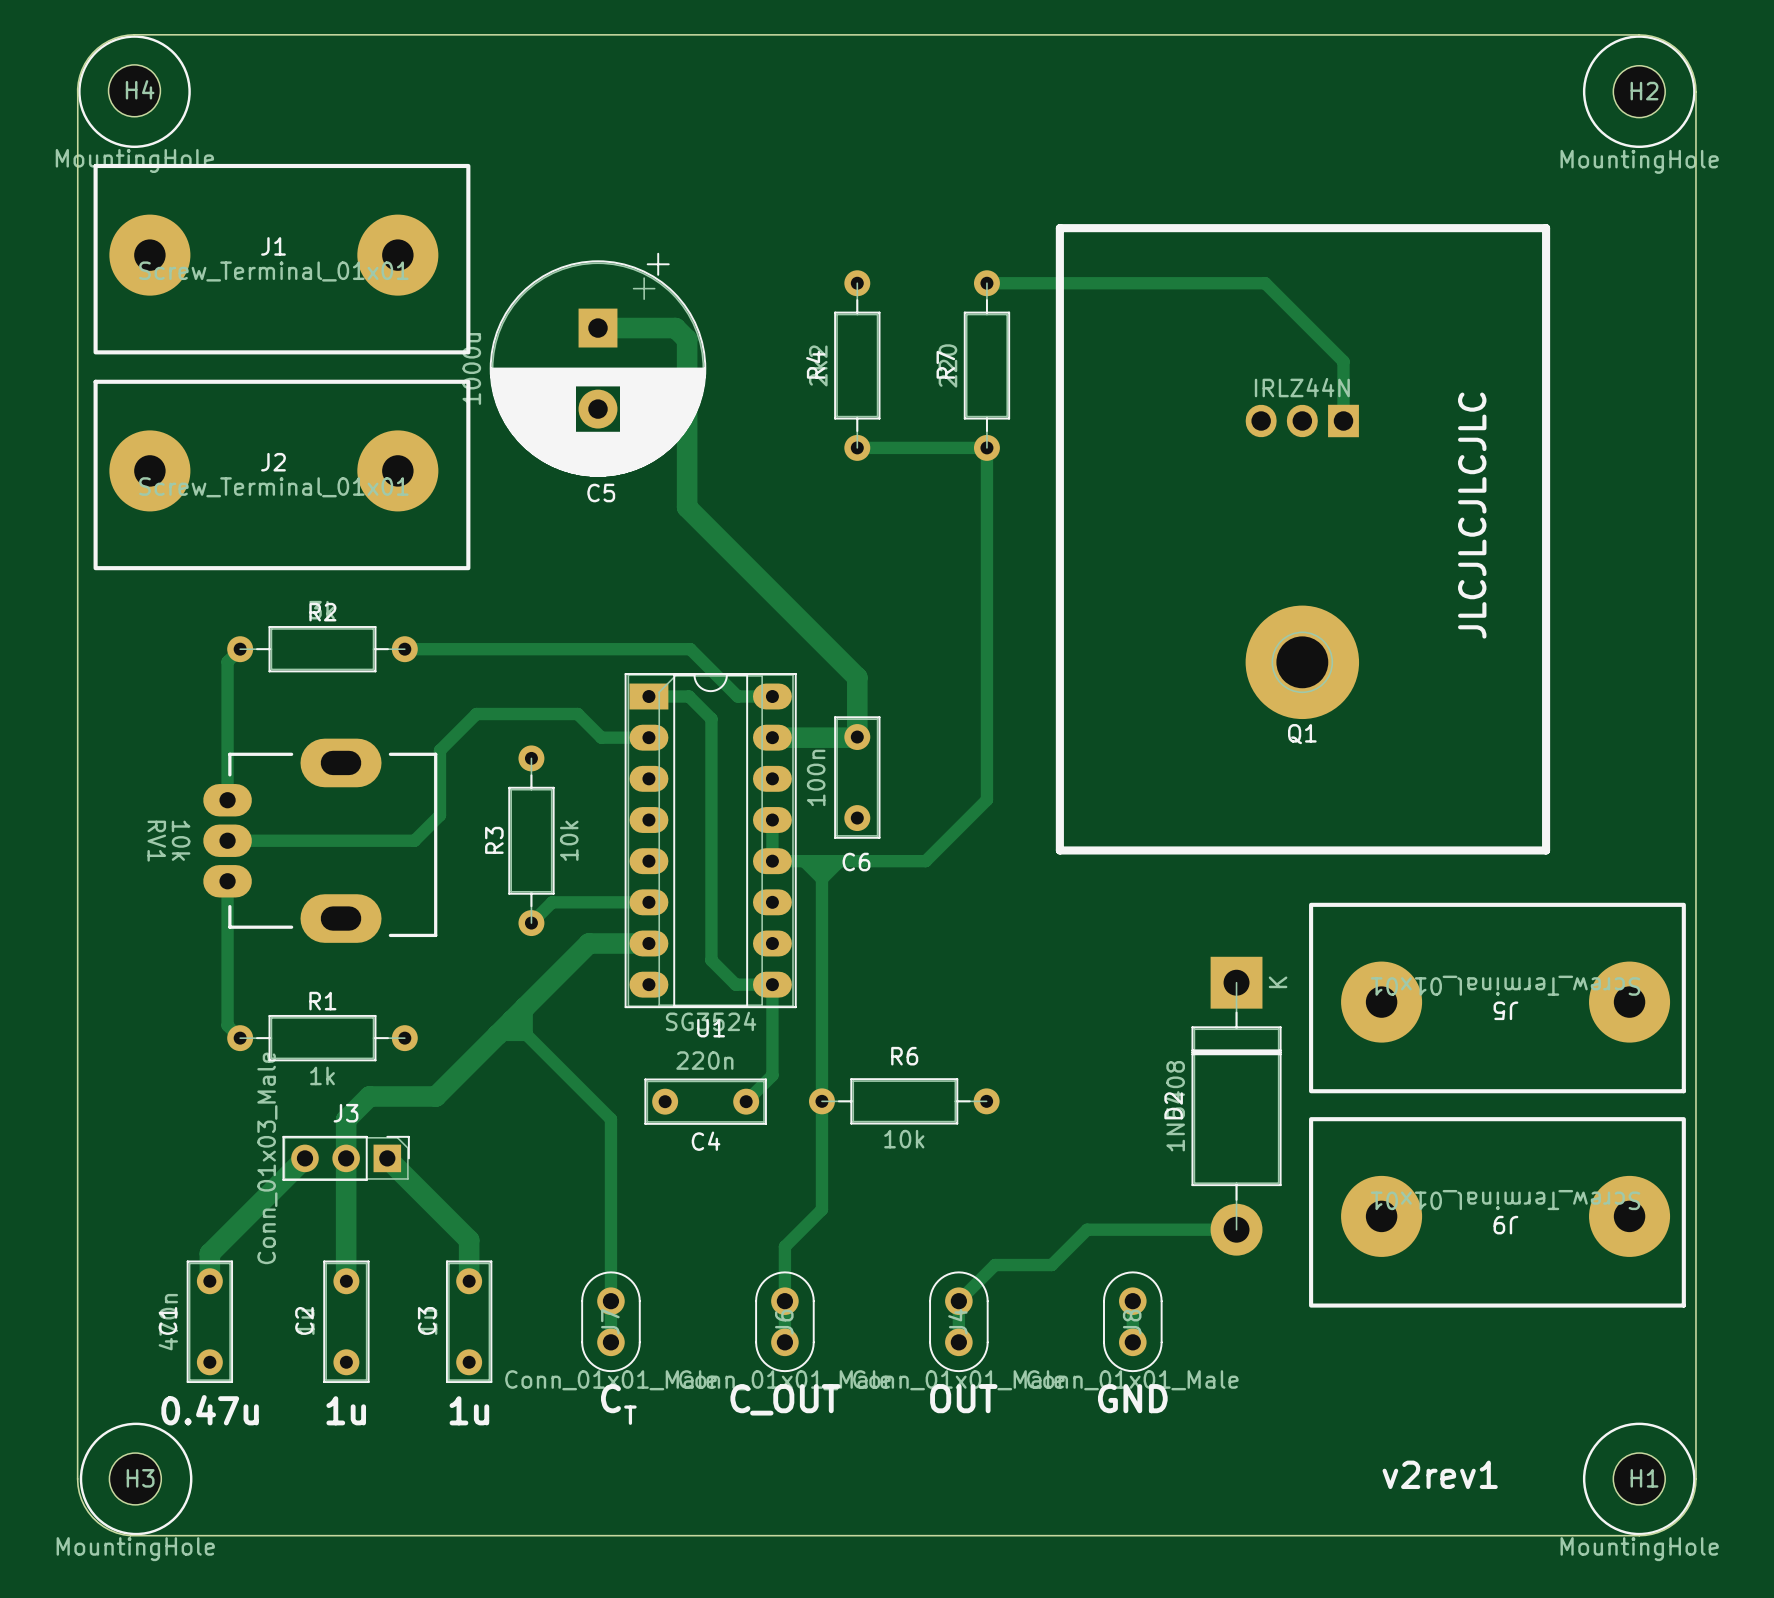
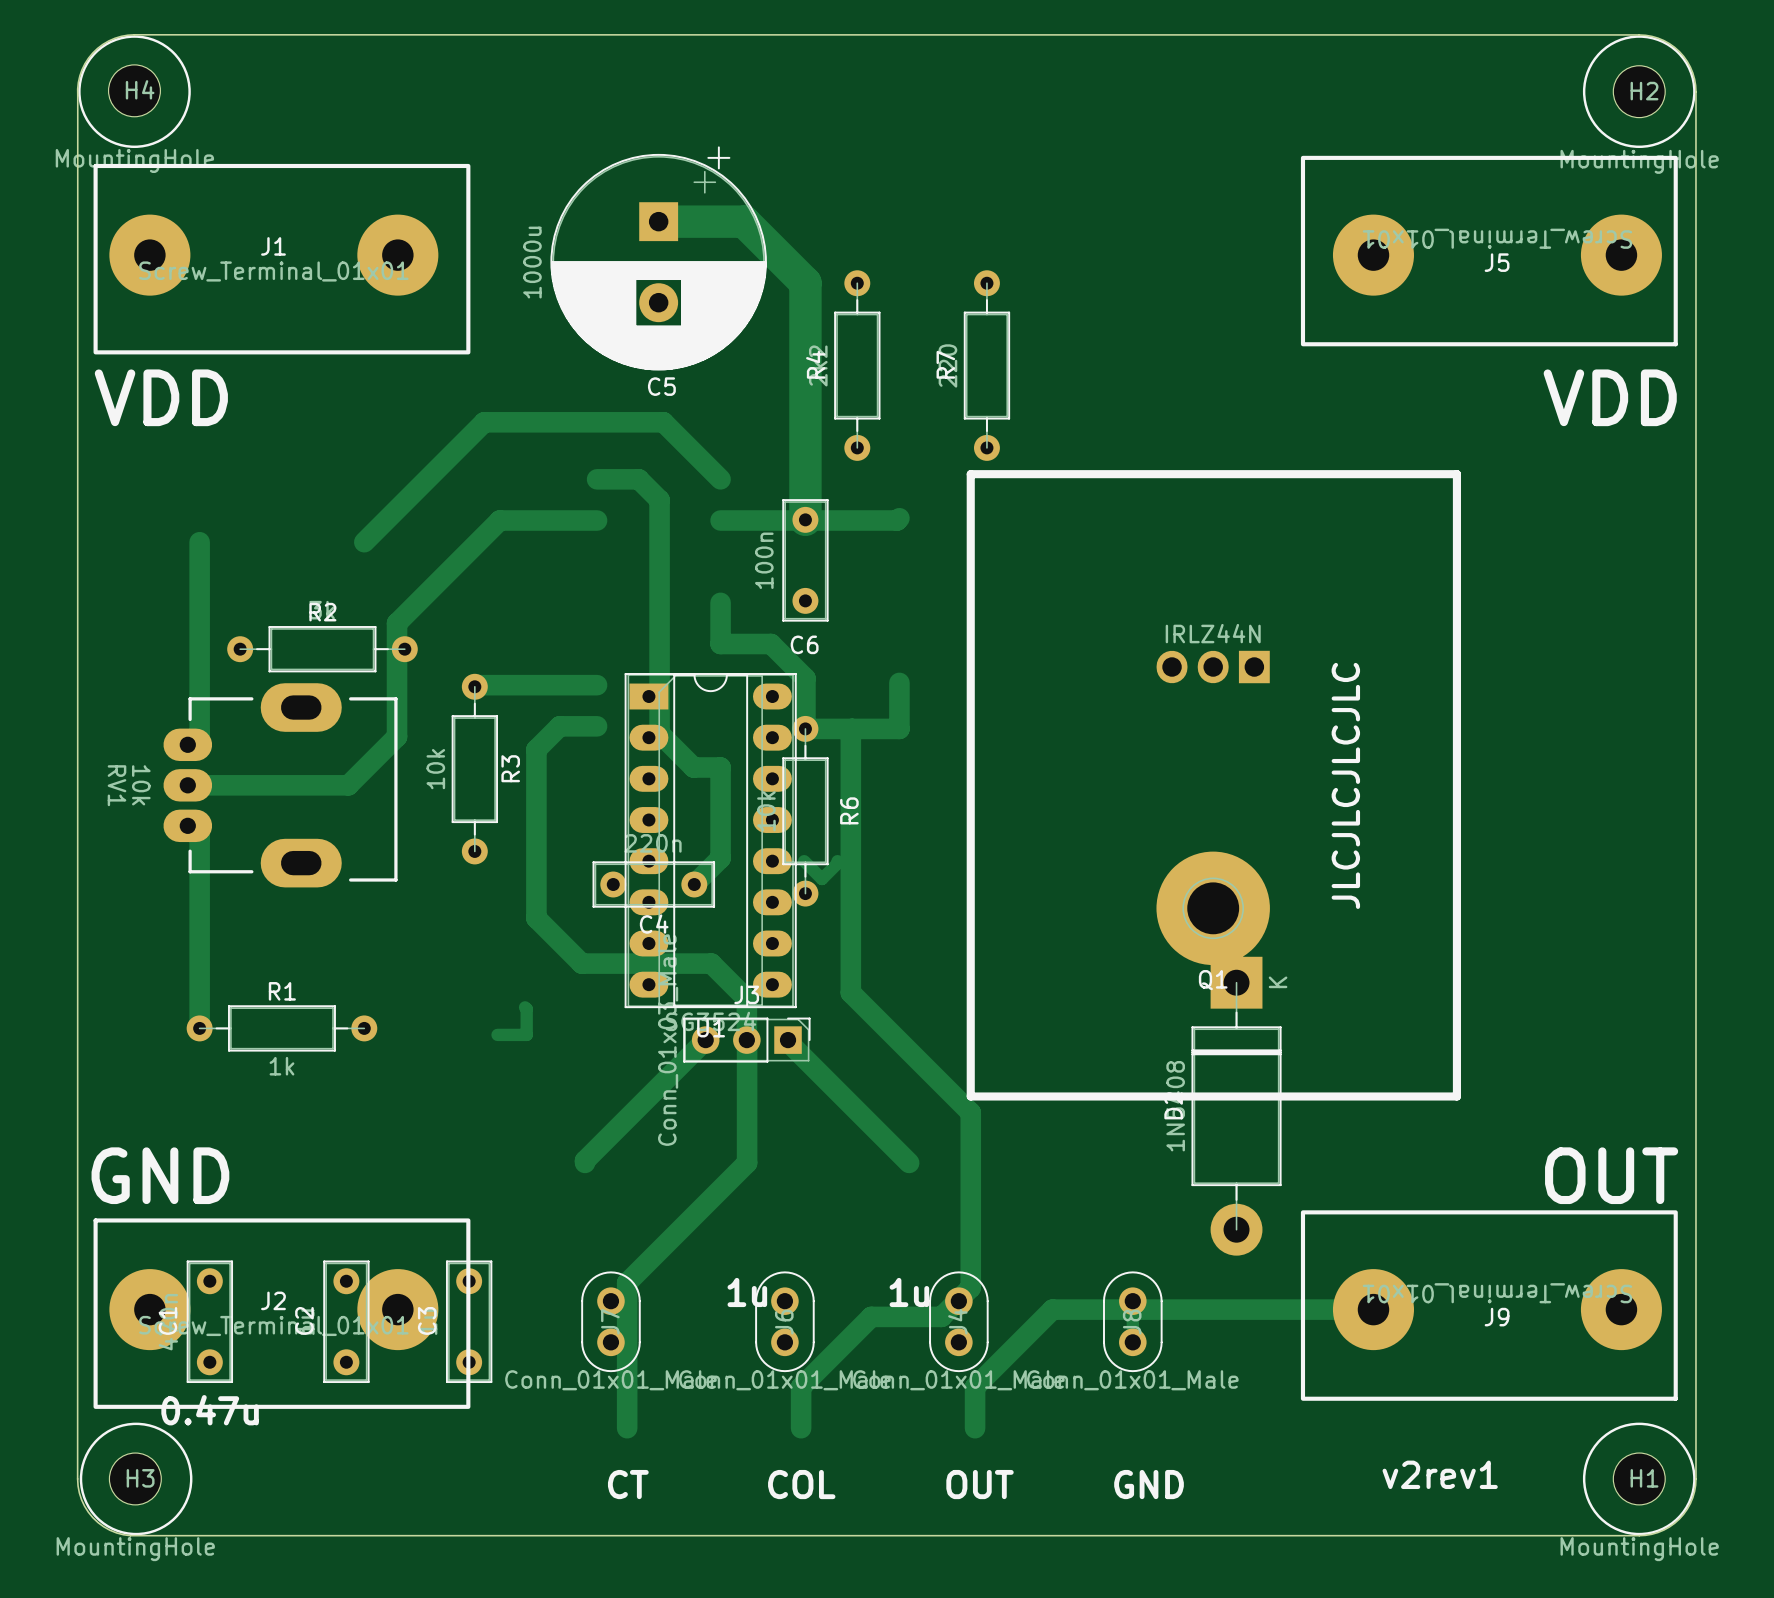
track: none -> (658, 221) (744, 221) (805, 282) (805, 519)
track: (986, 283) (1265, 283) (1343, 361) (1343, 421) -> none
track: (598, 328) (675, 328) (687, 339) (687, 507) (857, 677) (856, 737) (772, 737) -> none
C5 position: (598, 364) -> (658, 258)
text: none -> VDD (161, 397)
text: none -> VDD (1610, 397)
track: (857, 447) (986, 447) (986, 799) (925, 861) (772, 861) (772, 820) -> none
J2 position: (281, 474) -> (281, 1313)
track: none -> (597, 479) (638, 479) (659, 500) (659, 733) (693, 767) (720, 767) (720, 858) (694, 884)
track: none -> (720, 479) (663, 422) (484, 422) (364, 542)
text position: JLCJLCJLCJLC (1472, 515) -> JLCJLCJLCJLC (1345, 785)
track: none -> (899, 518) (897, 520) (720, 520)
track: none -> (597, 520) (499, 520) (397, 623) (397, 736) (348, 785) (187, 785)
Q1 position: (1302, 539) -> (1213, 785)
track: none -> (199, 542) (199, 732) (187, 744)
track: none -> (720, 602) (720, 644) (771, 644) (805, 678) (805, 728) (899, 728) (899, 682)
track: (240, 649) (227, 661) (227, 800) -> none
track: (404, 649) (690, 649) (737, 696) (772, 696) -> none
track: none -> (597, 685) (476, 685) (474, 686)
track: (648, 696) (689, 696) (711, 718) (711, 960) (735, 984) (772, 984) (772, 1075) (746, 1101) -> none
track: none -> (597, 726) (559, 726) (536, 749) (536, 918) (581, 963) (711, 963) (746, 999) (747, 1162) (627, 1282) (627, 1428)
track: none -> (852, 728) (850, 992) (970, 1112) (970, 1287) (941, 1316) (871, 1316) (801, 1387) (801, 1428)
track: (648, 737) (601, 737) (577, 714) (476, 714) (439, 750) (439, 815) (414, 840) (227, 840) -> none
C6 position: (857, 777) -> (805, 560)
track: none -> (187, 825) (199, 837) (199, 1028)
RV1 position: (320, 840) -> (280, 785)
R3 name position: R3 (494, 840) -> R3 (510, 768)
R3 position: (531, 840) -> (474, 769)
R3 value position: 10k (569, 840) -> 10k (435, 769)
track: (824, 861) (821, 863) (821, 1209) (784, 1246) (784, 1342) -> none
track: (227, 881) (227, 1025) (240, 1038) -> none
track: (648, 902) (552, 902) (531, 923) -> none
track: (648, 943) (588, 943) (435, 1096) (369, 1096) (346, 1119) (346, 1281) -> none
J5 position: (1497, 998) -> (1489, 251)
J5 name rotation: 0° (1505, 1010) -> 180° (1497, 262)
track: (512, 1020) (610, 1119) (610, 1342) -> none
R1 position: (322, 1038) -> (281, 1028)
track: none -> (705, 1040) (585, 1160) (585, 1162)
track: none -> (788, 1040) (909, 1162)
C4 position: (705, 1101) -> (653, 884)
R6 rotation: 0° (904, 1101) -> 90° clockwise (805, 811)
R6 position: (904, 1101) -> (805, 811)
track: (304, 1158) (209, 1253) (209, 1281) -> none
J3 position: (346, 1158) -> (746, 1040)
track: (387, 1158) (469, 1240) (469, 1281) -> none
text: none -> GND (160, 1175)
text: none -> OUT (1611, 1175)
J9 position: (1497, 1212) -> (1489, 1305)
J9 name rotation: 0° (1505, 1225) -> 180° (1497, 1317)
track: (1236, 1229) (1087, 1229) (1051, 1265) (995, 1265) (958, 1301) (958, 1342) -> none
text: none -> 1u (747, 1292)
text: none -> 1u (909, 1292)
track: none -> (1373, 1309) (1052, 1309) (975, 1387) (975, 1428)
text: C (610, 1398) -> none
text position: OUT (963, 1398) -> OUT (980, 1484)
text position: GND (1132, 1398) -> GND (1149, 1484)
text: C_OUT (785, 1399) -> none
text: 1u (346, 1410) -> none
text: 1u (469, 1410) -> none
text: T (630, 1415) -> none
text: none -> CT (628, 1484)
text: none -> COL (801, 1484)

